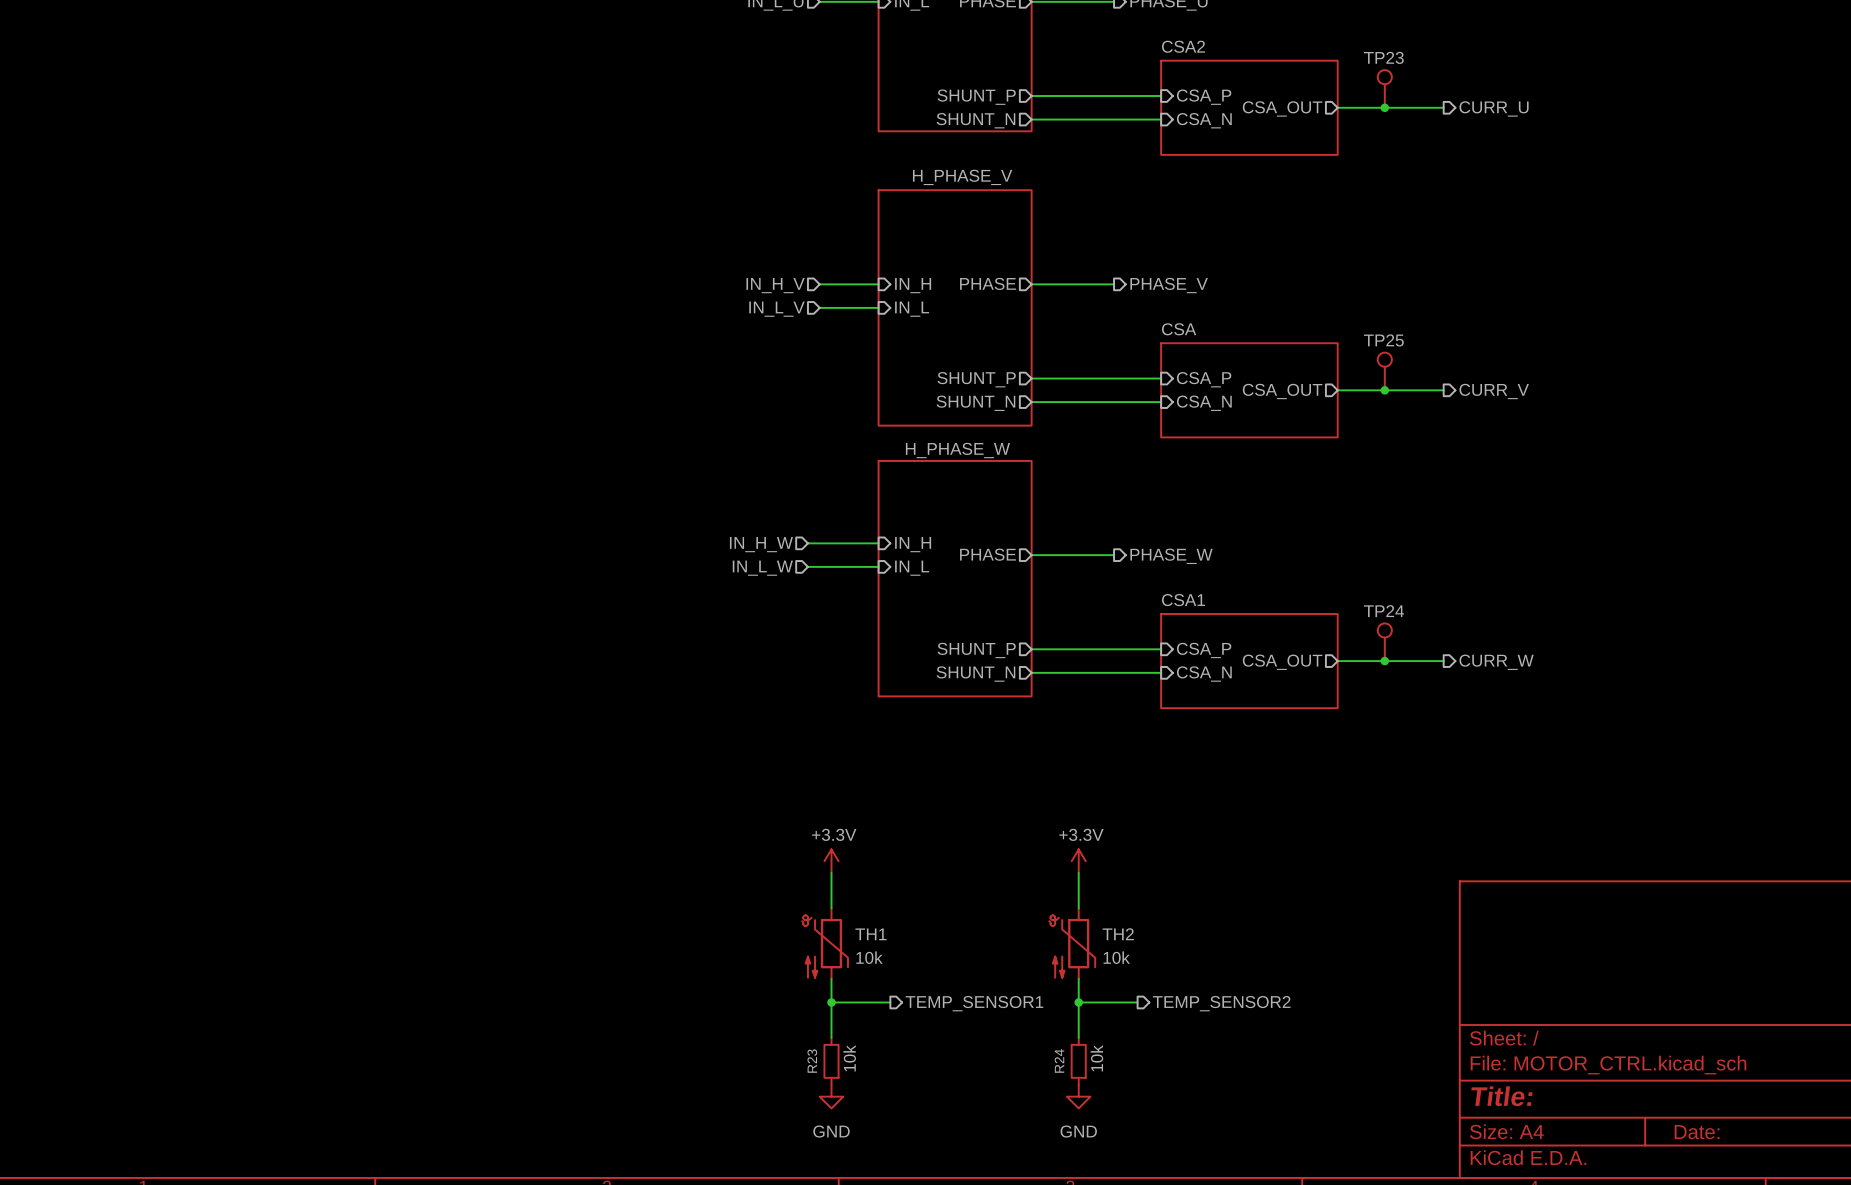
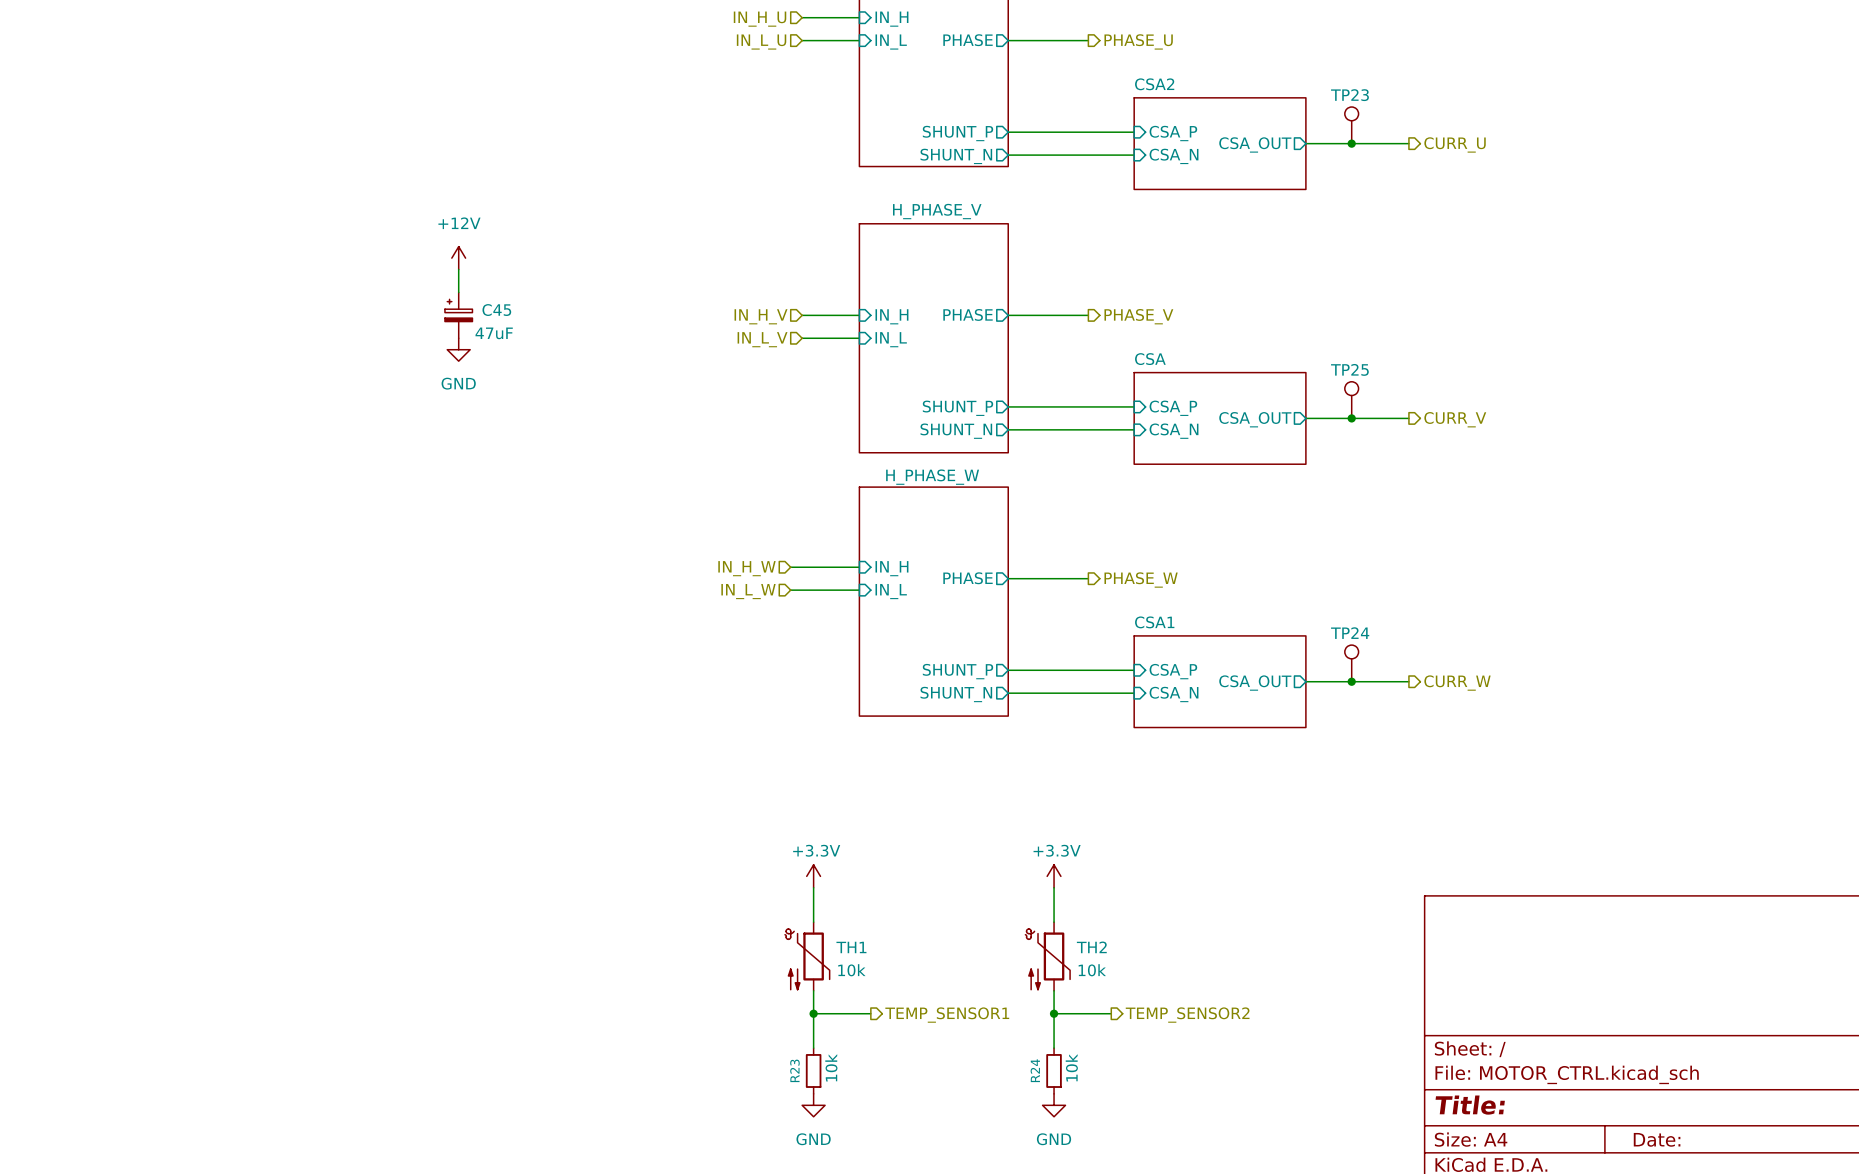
power symbol: none -> +12V (458, 258)
wire: none -> (458, 269) (458, 292)
C45: none -> 47uF (458, 315)
power symbol: none -> GND (458, 349)

